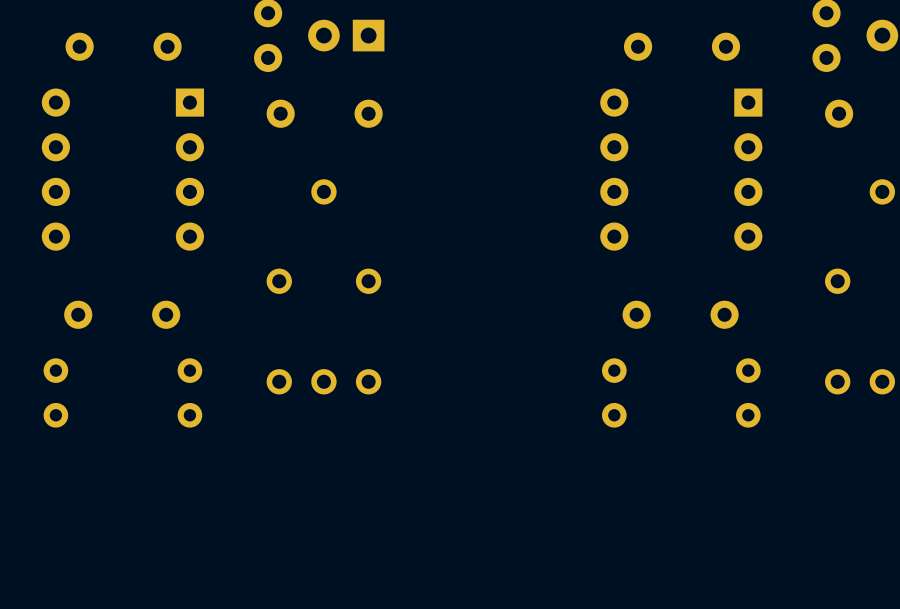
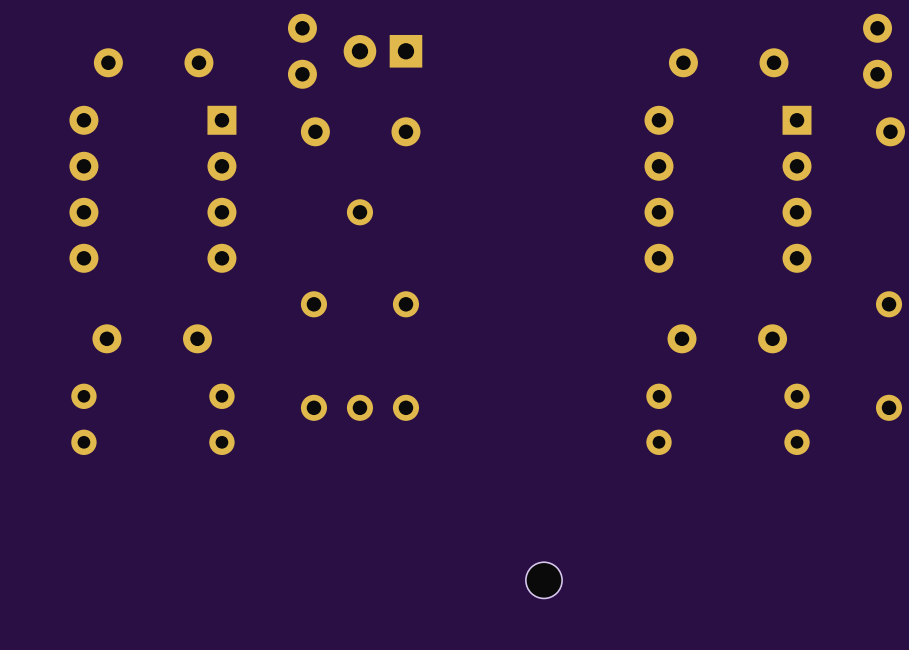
part: none -> (543, 580)

